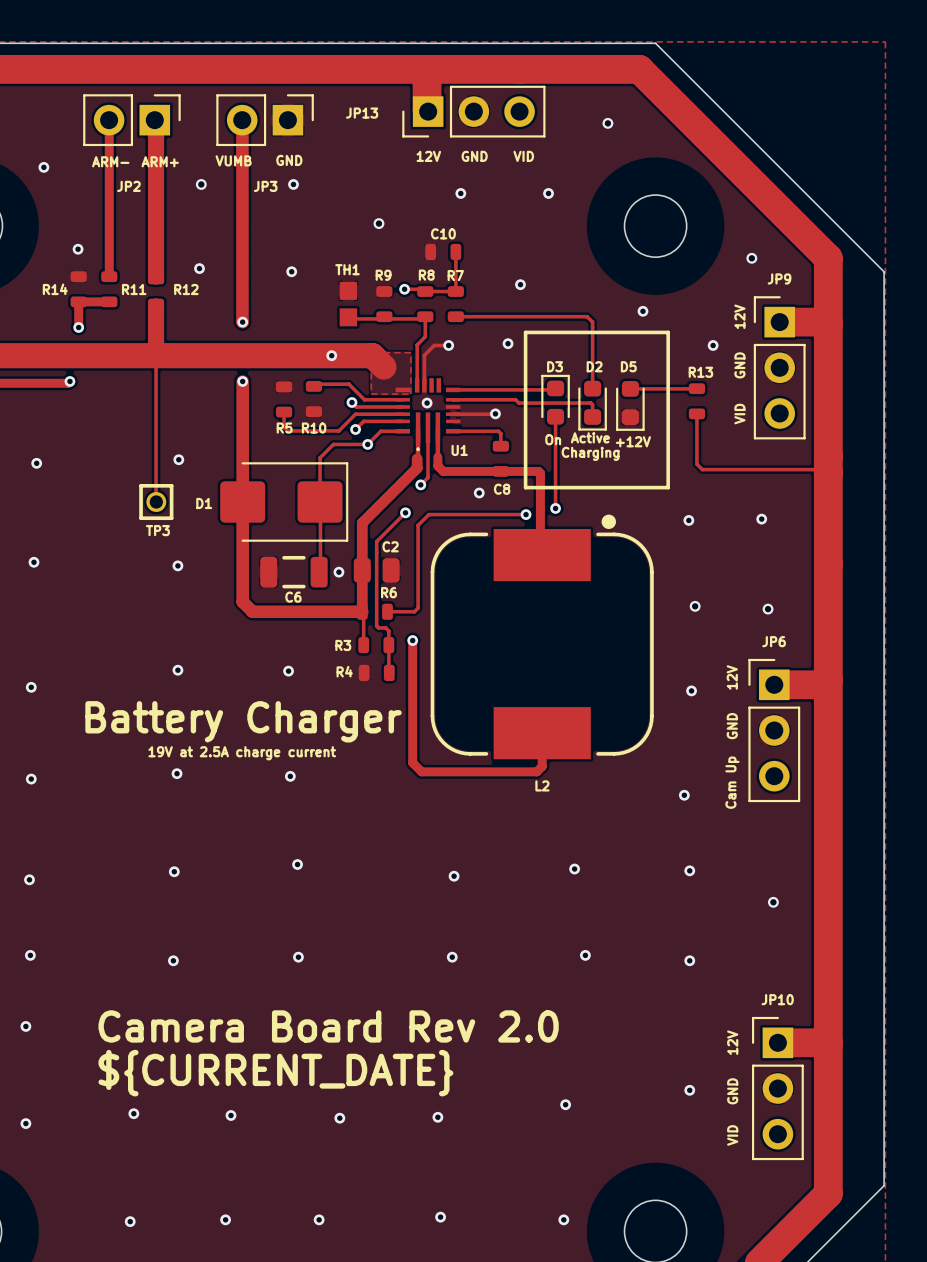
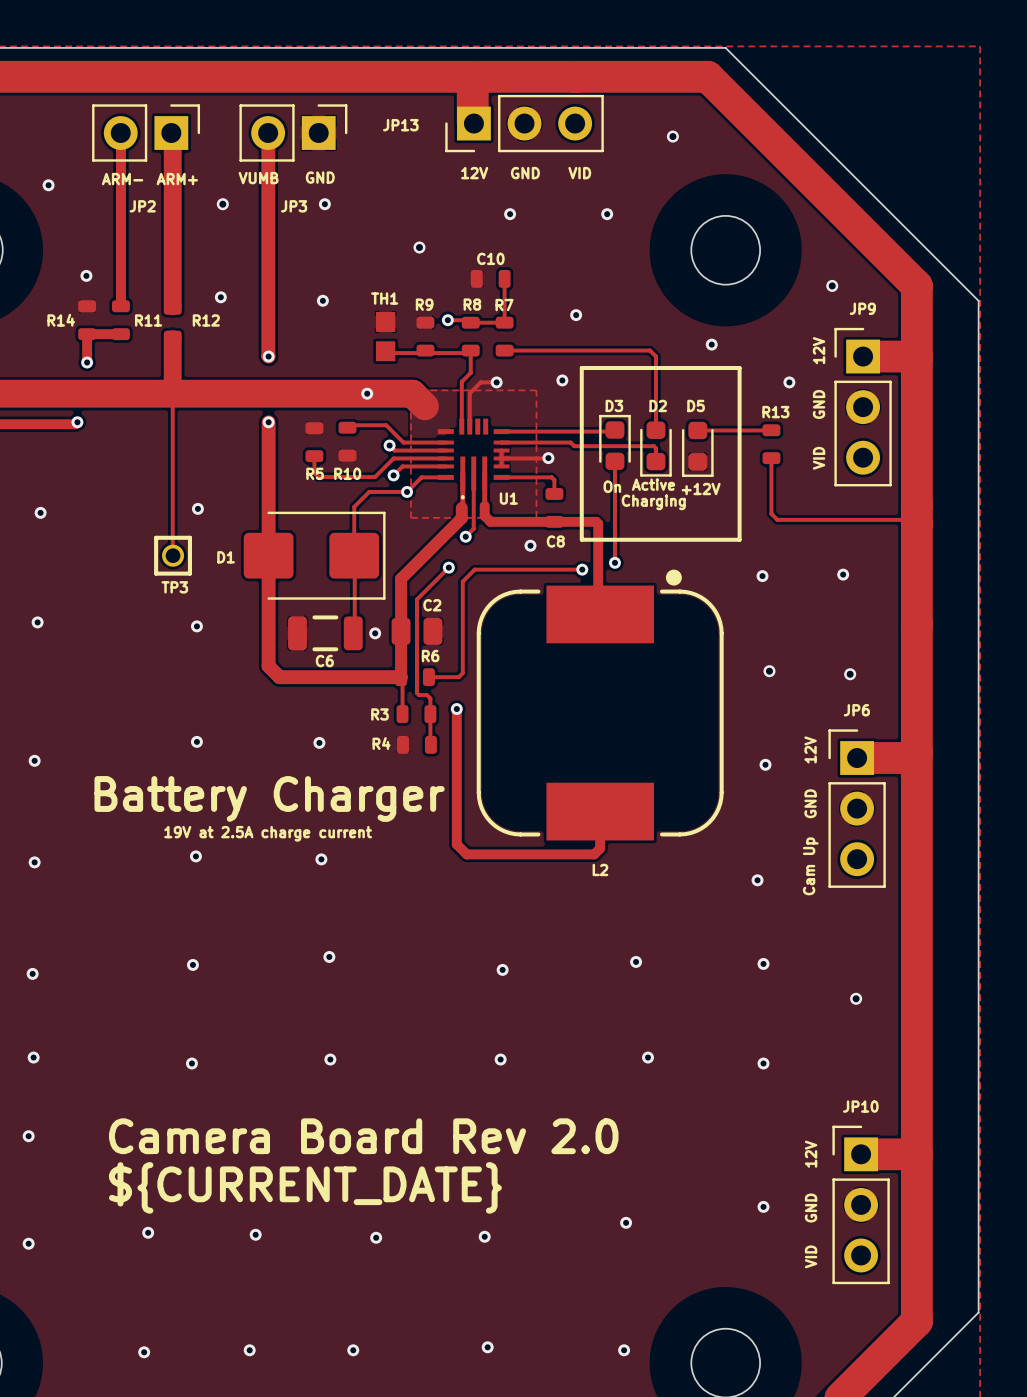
zone outline: (410, 352) (410, 394) (371, 394) -> (454, 390) (536, 390) (536, 517) (411, 517) (411, 436)
via: (427, 403) -> none
track: none -> (501, 450) (501, 466)

